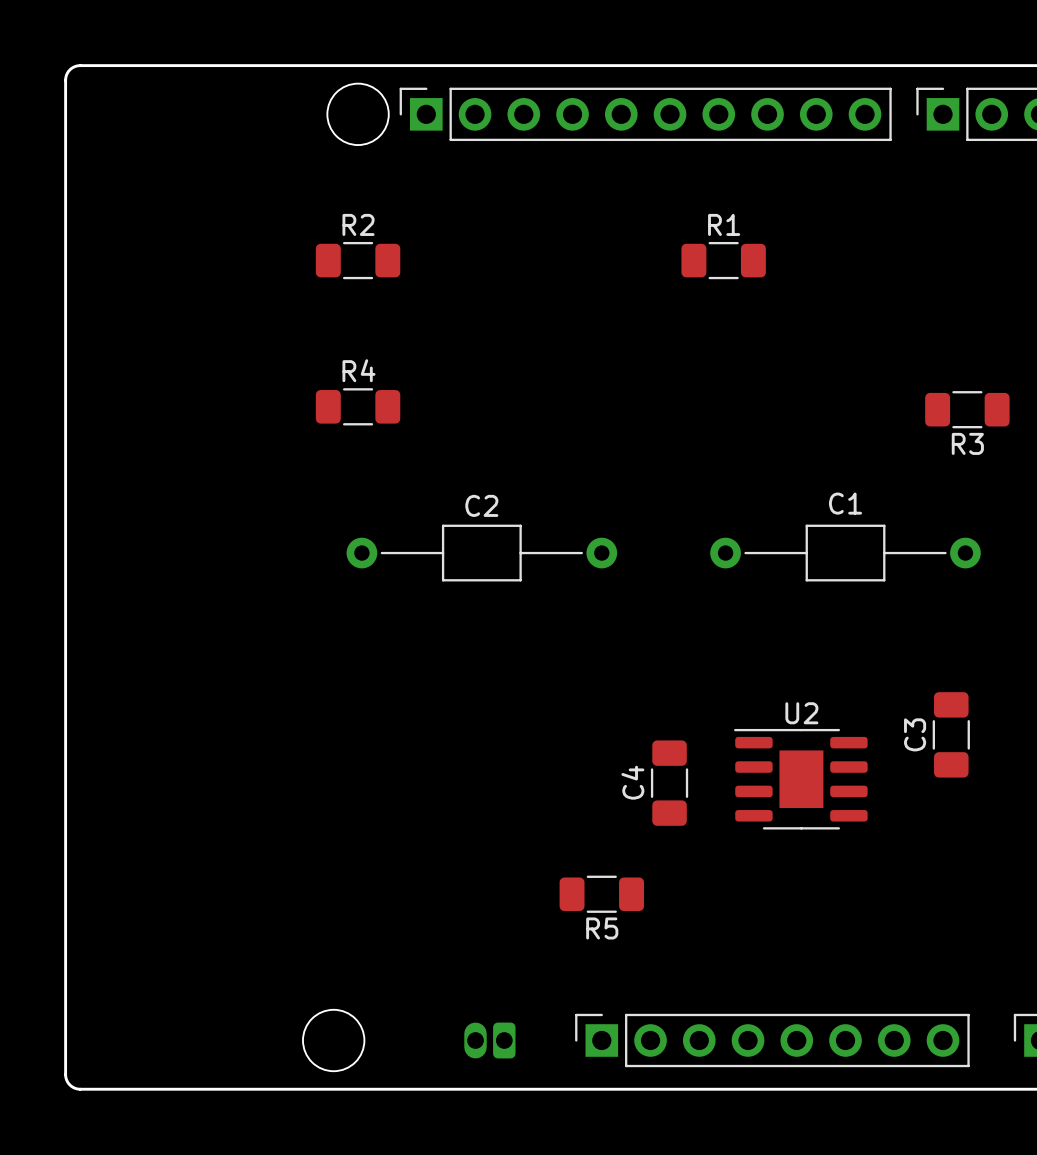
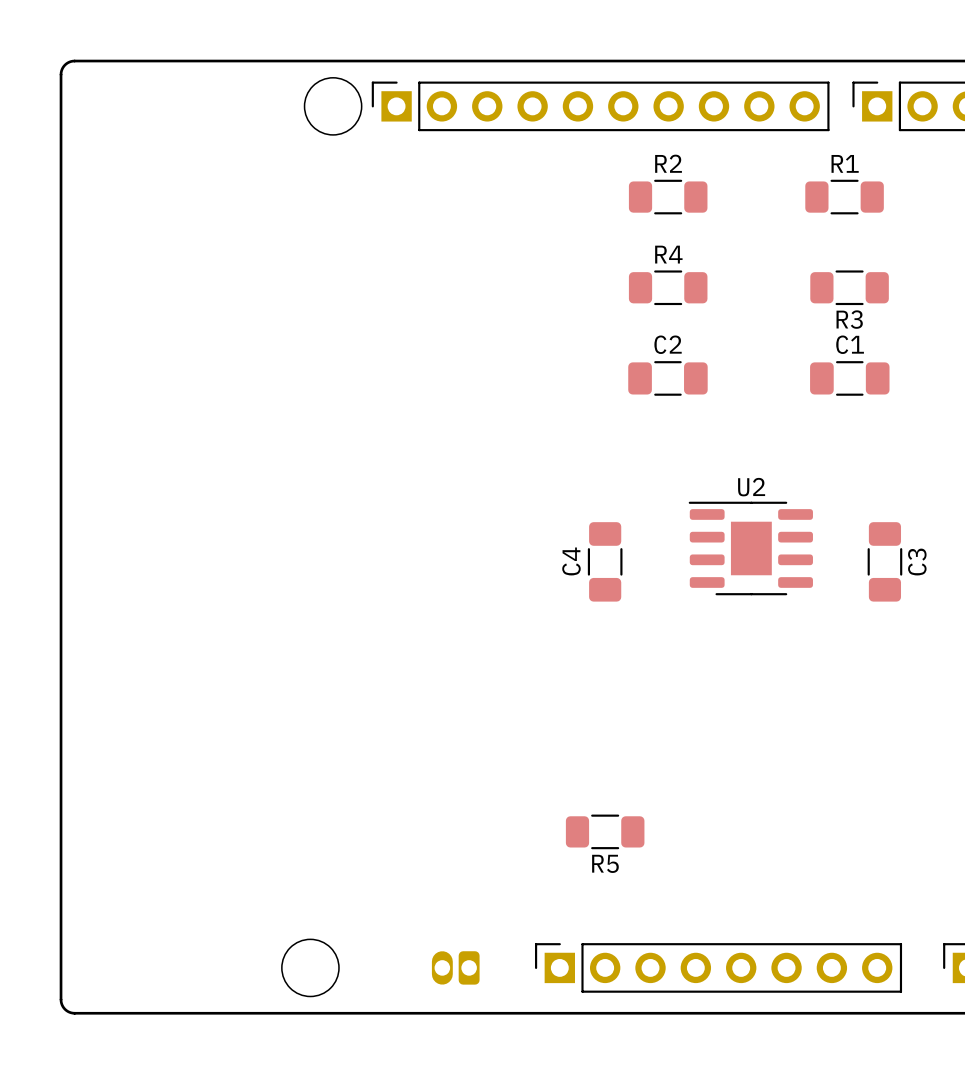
R2 position: (358, 260) -> (668, 197)
R1 position: (723, 260) -> (844, 197)
R4 position: (358, 406) -> (668, 287)
R3 position: (967, 409) -> (849, 287)
C2 footprint: [346, 524, 618, 582] -> [628, 361, 708, 396]
C1 footprint: [710, 524, 981, 582] -> [810, 361, 890, 396]
C3 name position: C3 (915, 734) -> C3 (917, 562)
C3 position: (951, 734) -> (884, 561)
U2 position: (800, 779) -> (750, 548)
C4 position: (669, 783) -> (605, 561)
R5 position: (601, 894) -> (605, 831)

